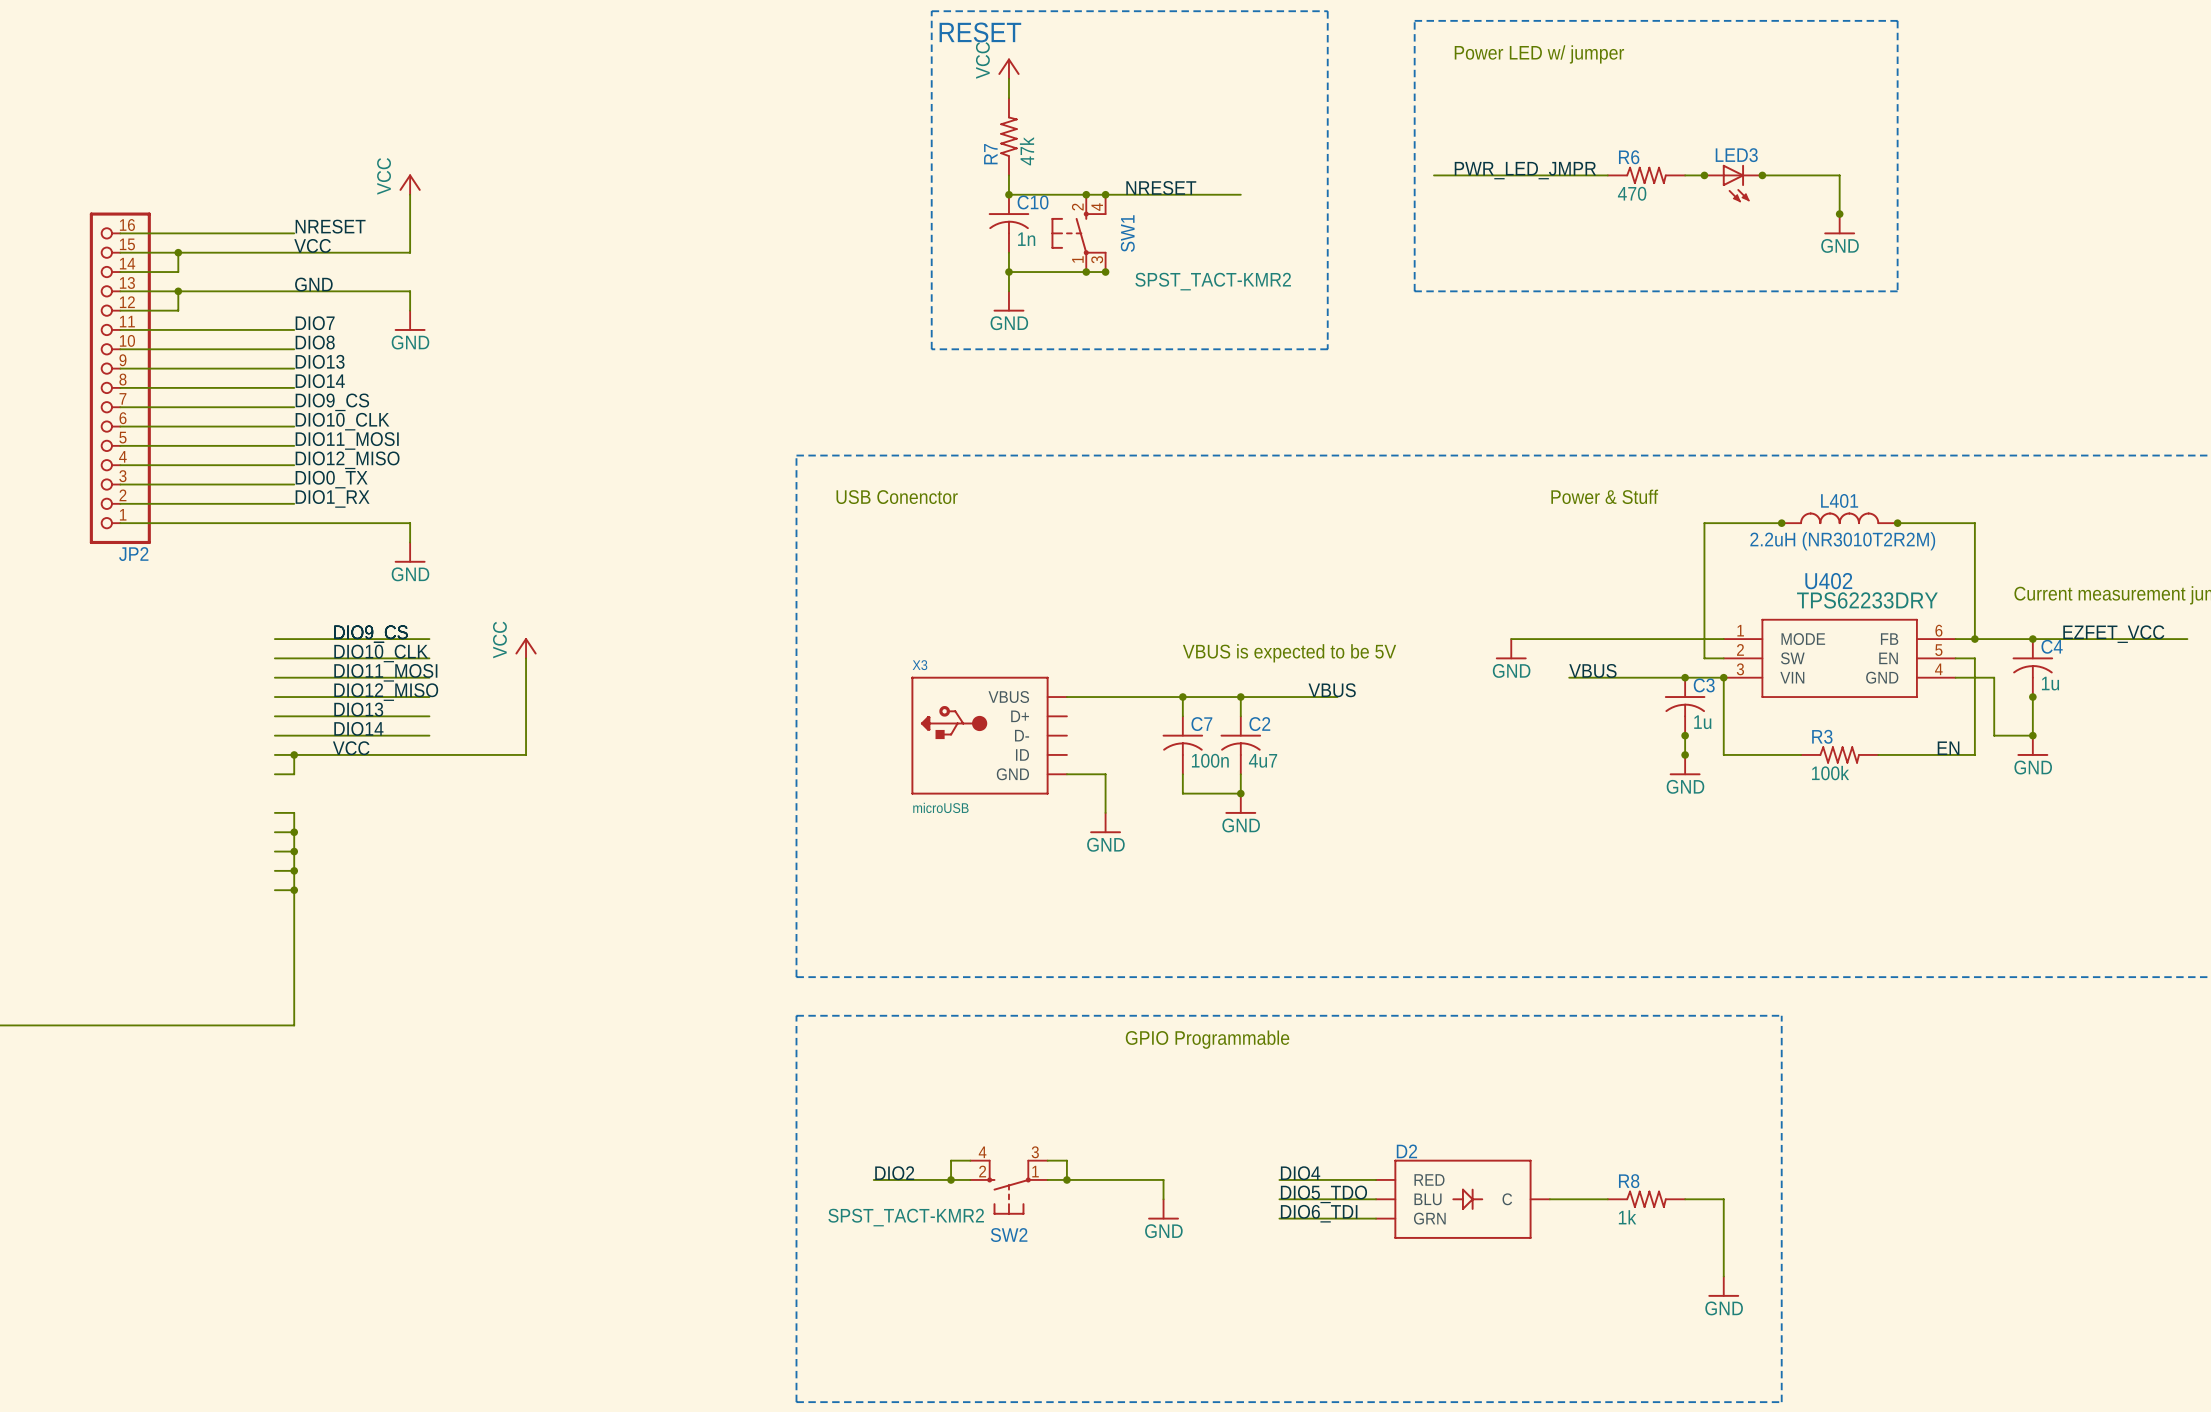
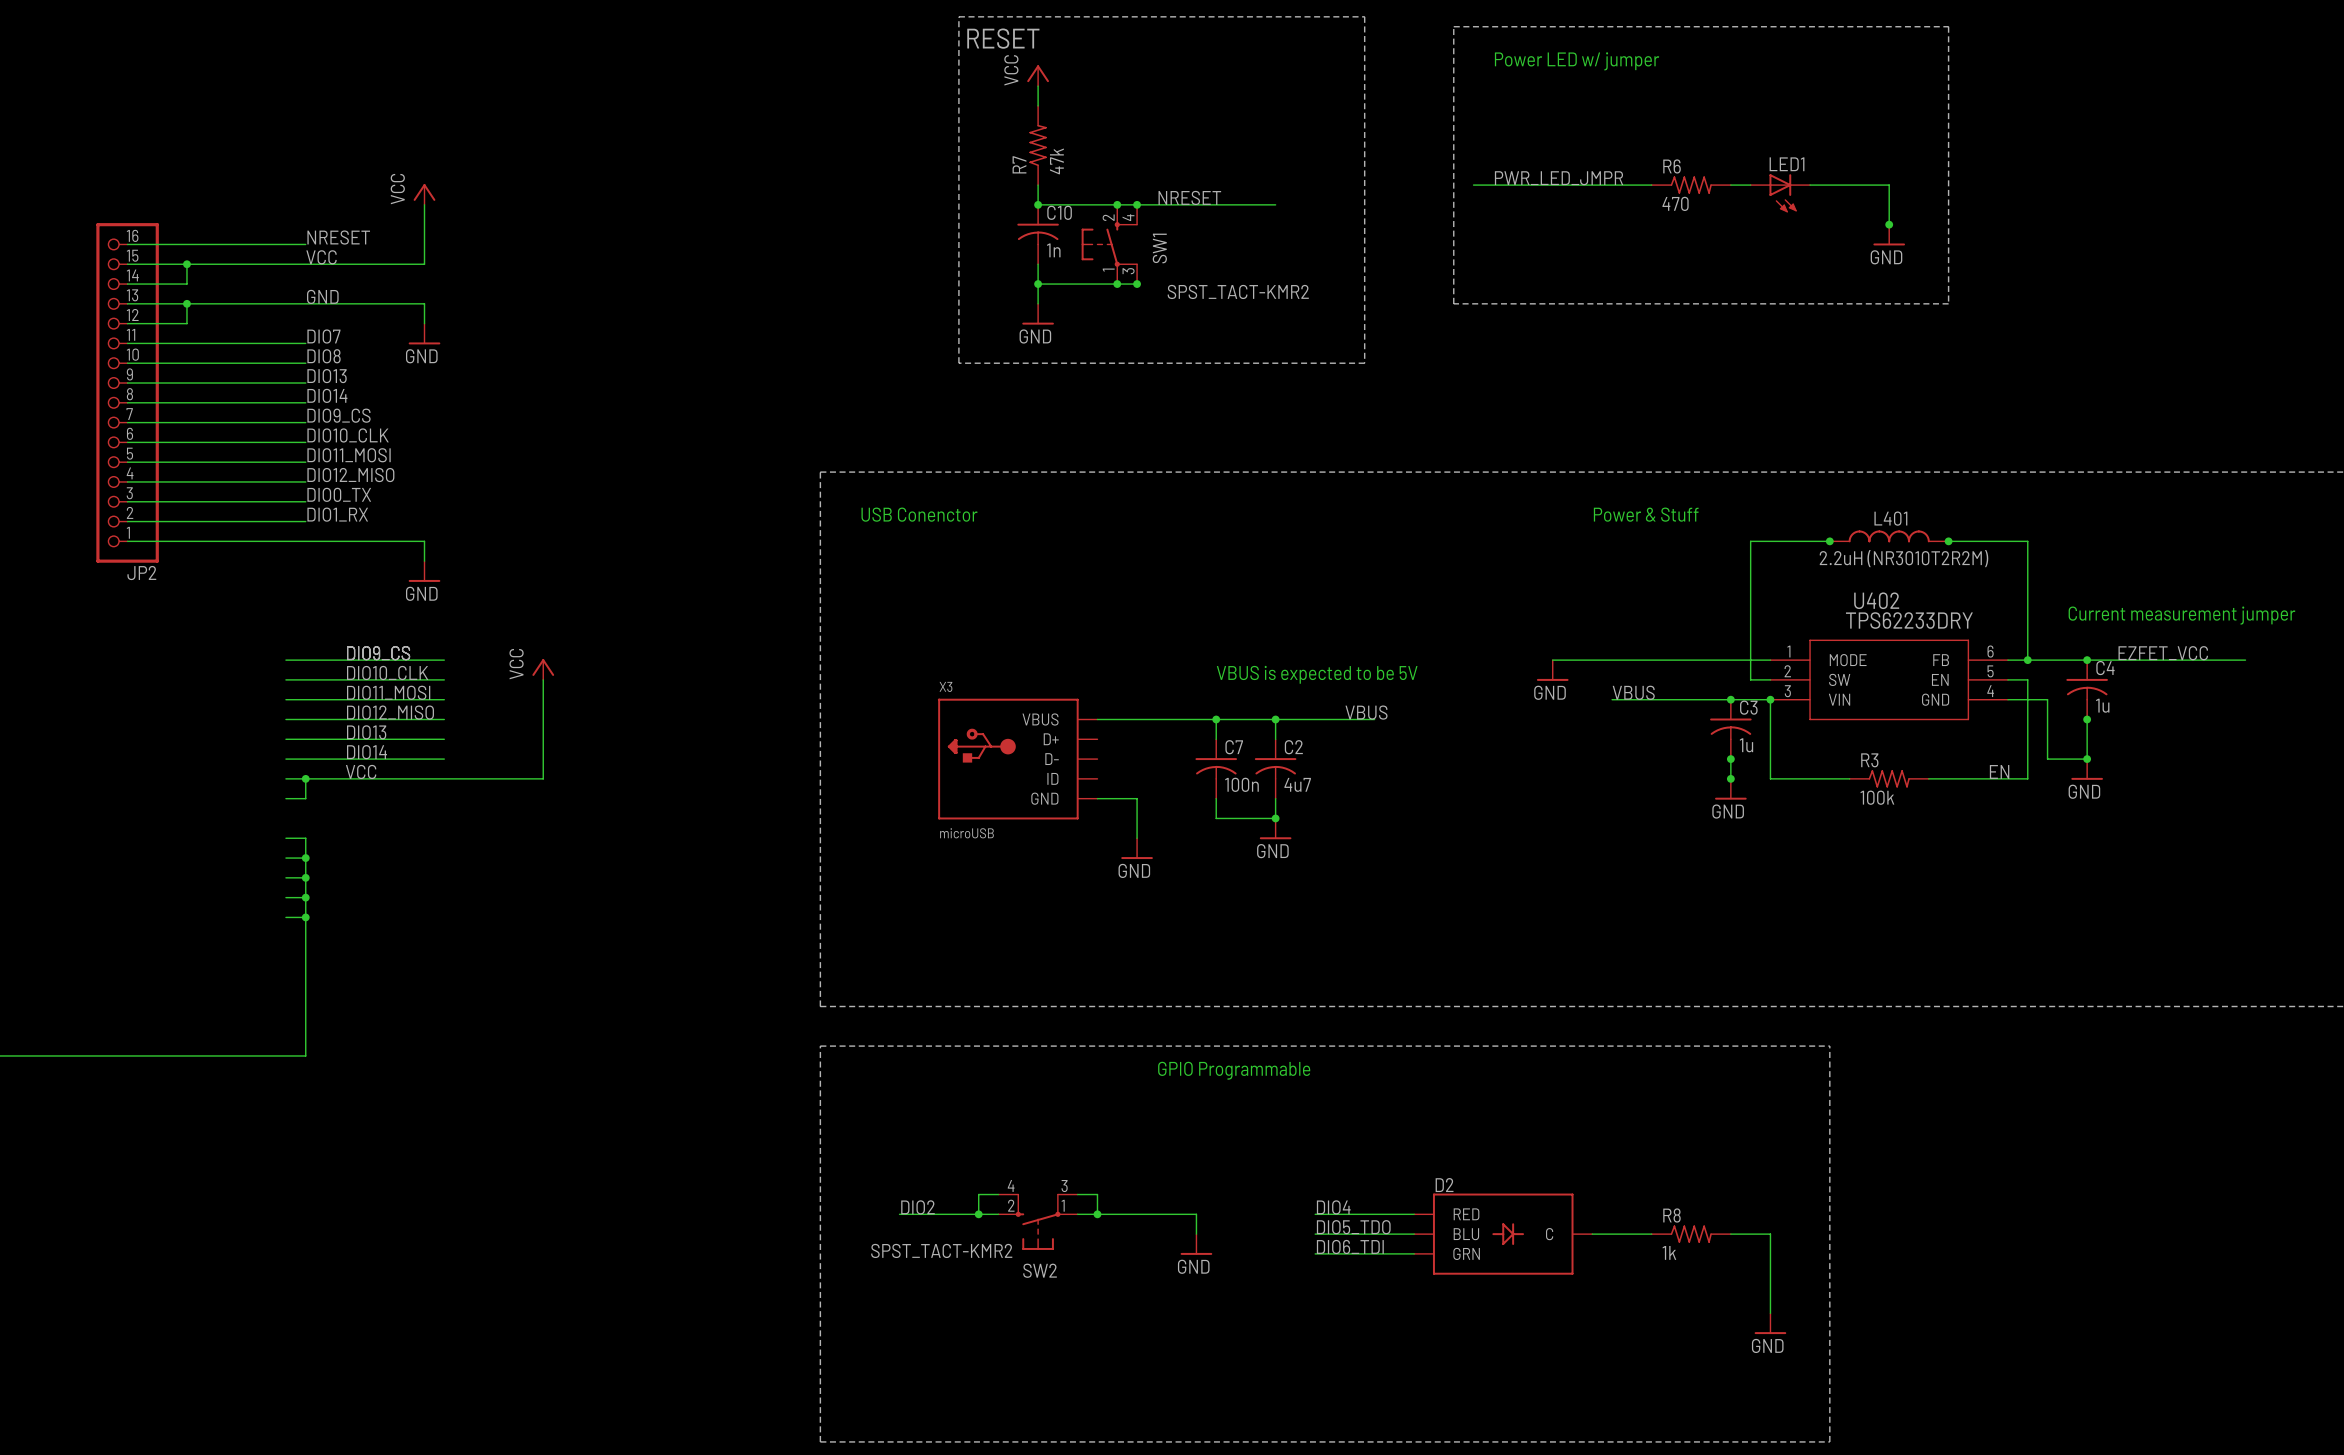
LED3 name: LED3 (1736, 155) -> LED1 (1787, 164)
junction: (1704, 175) -> none
junction: (1762, 175) -> none

